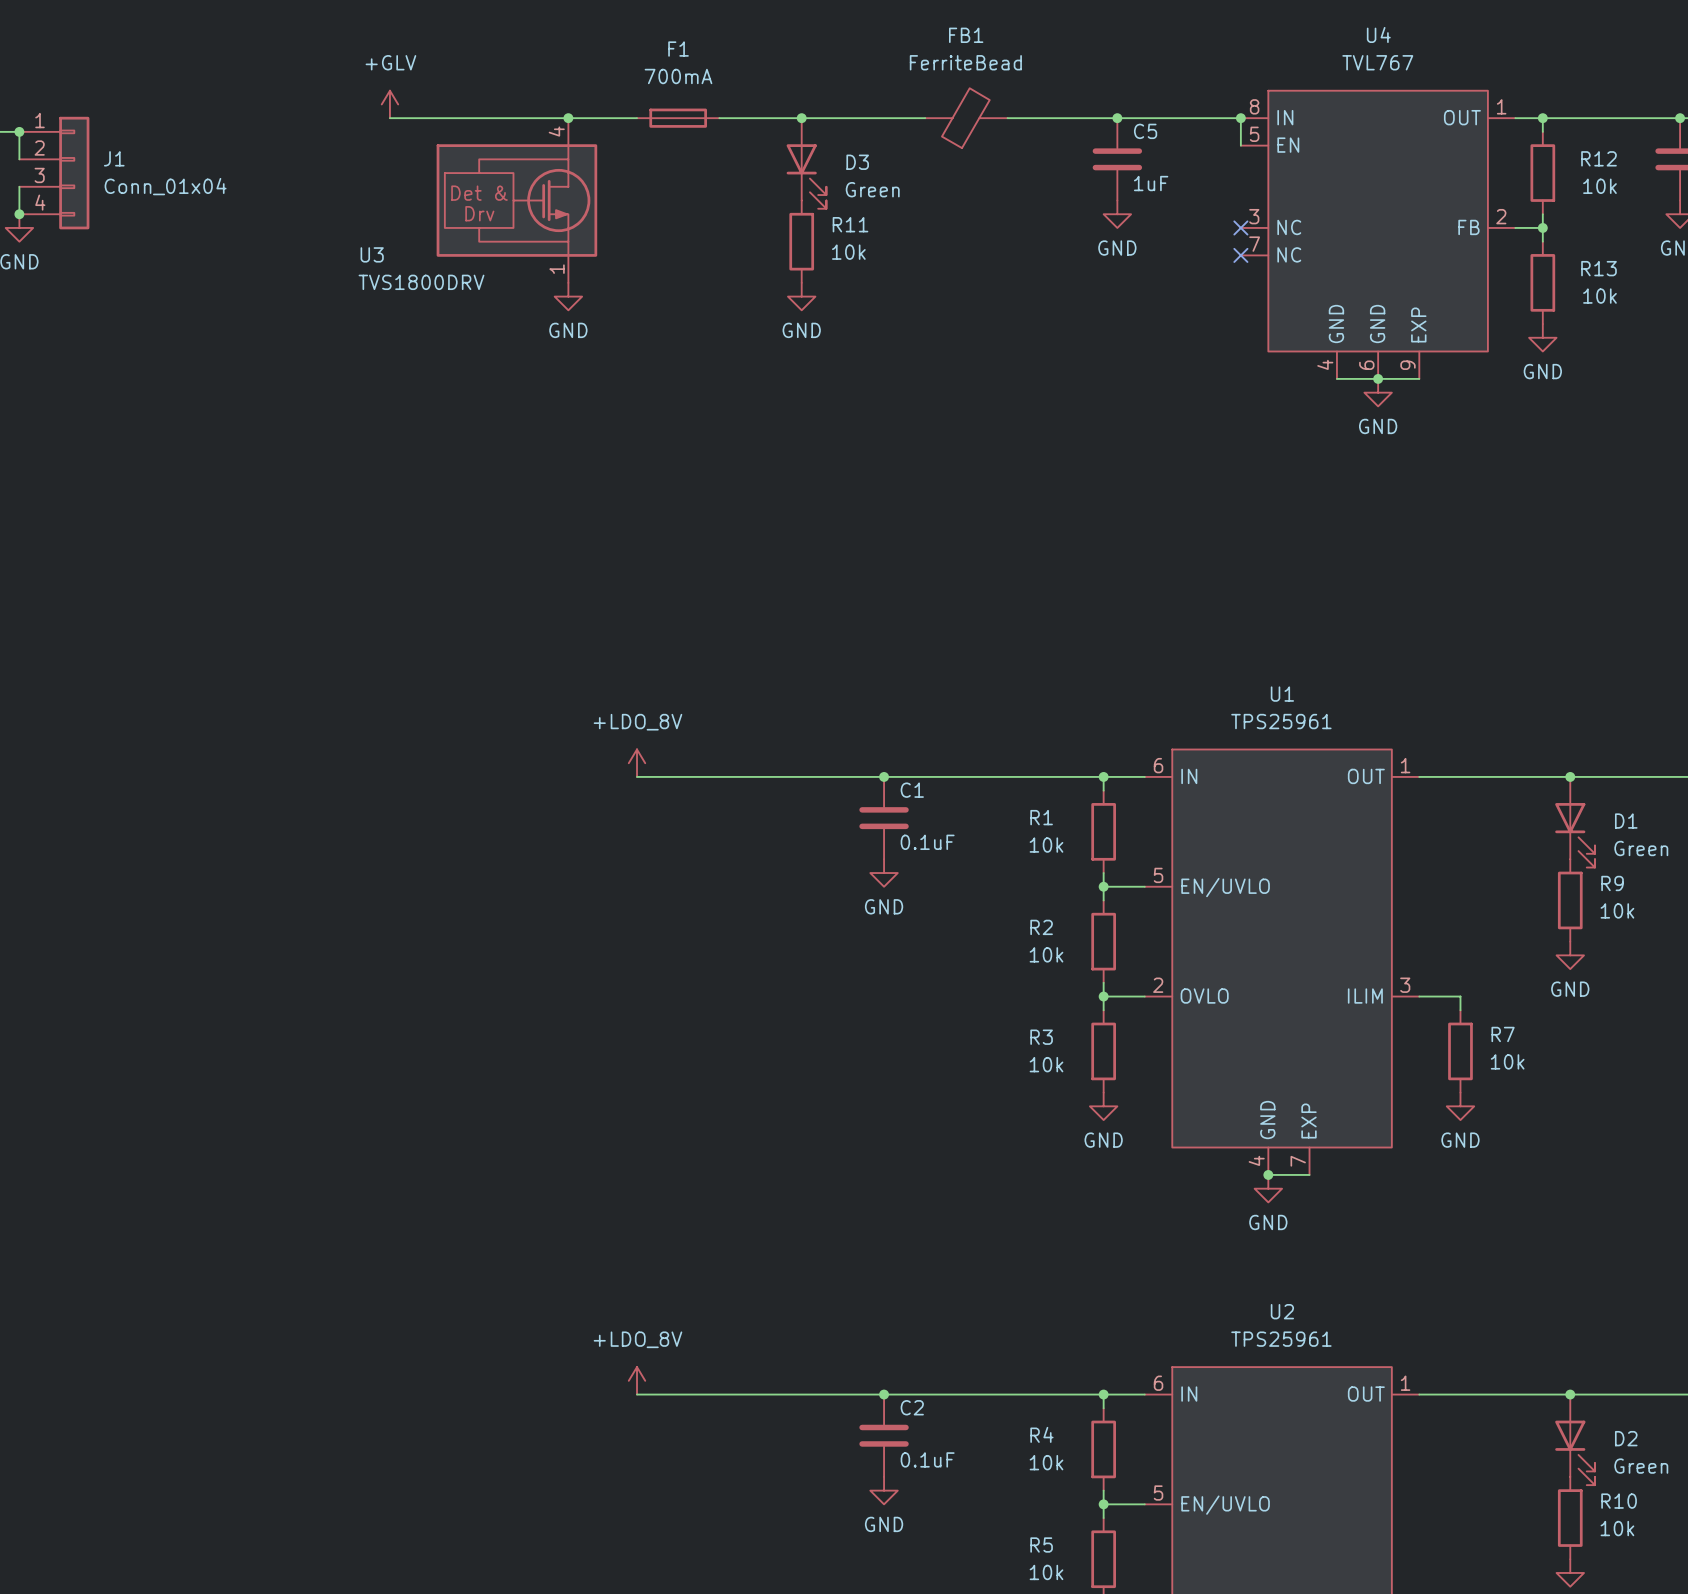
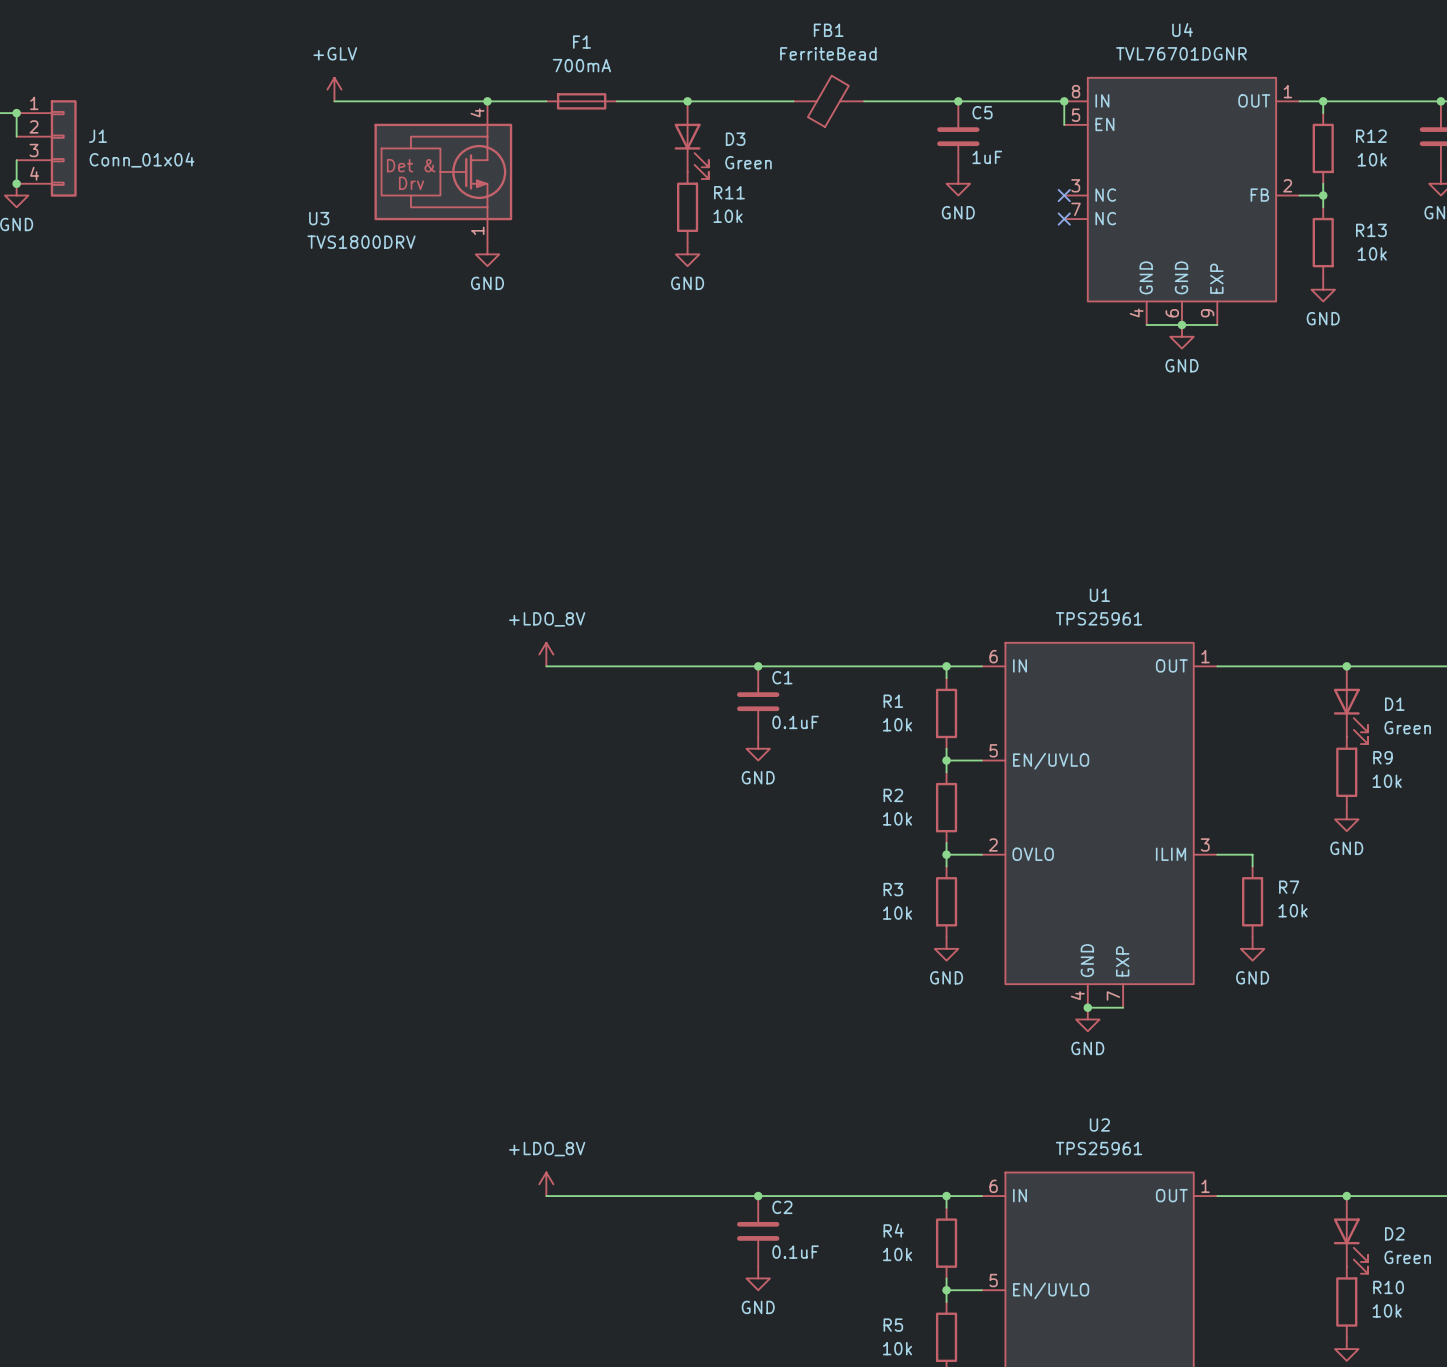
U4 value: TVL767 (1377, 62) -> TVL76701DGNR (1181, 53)

